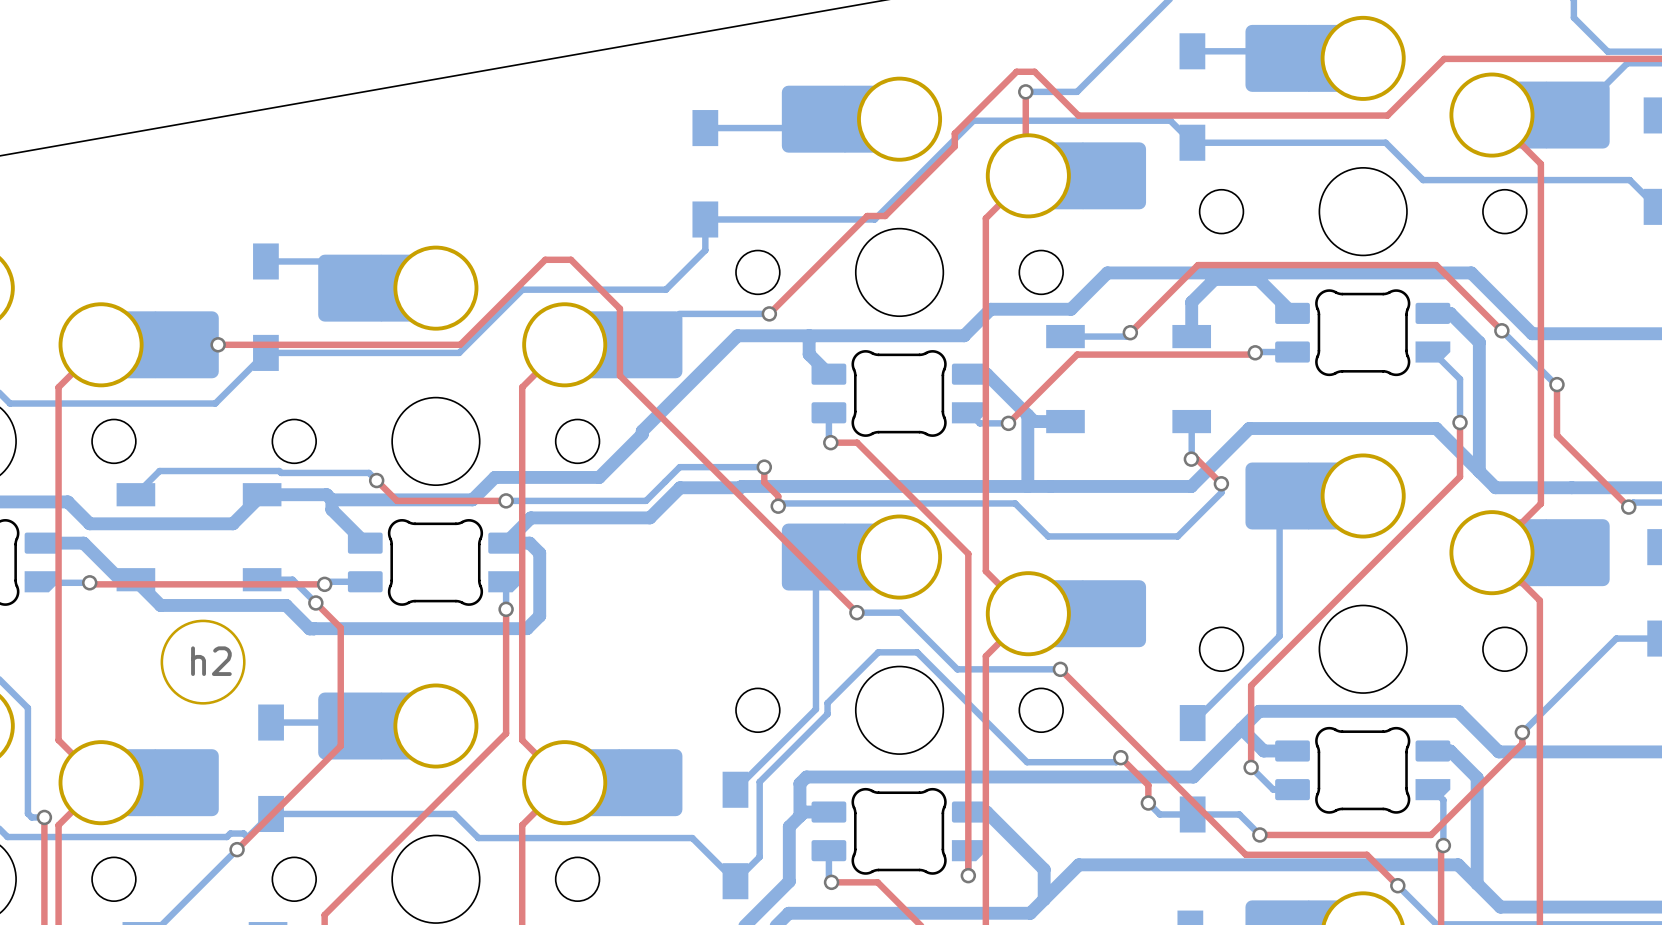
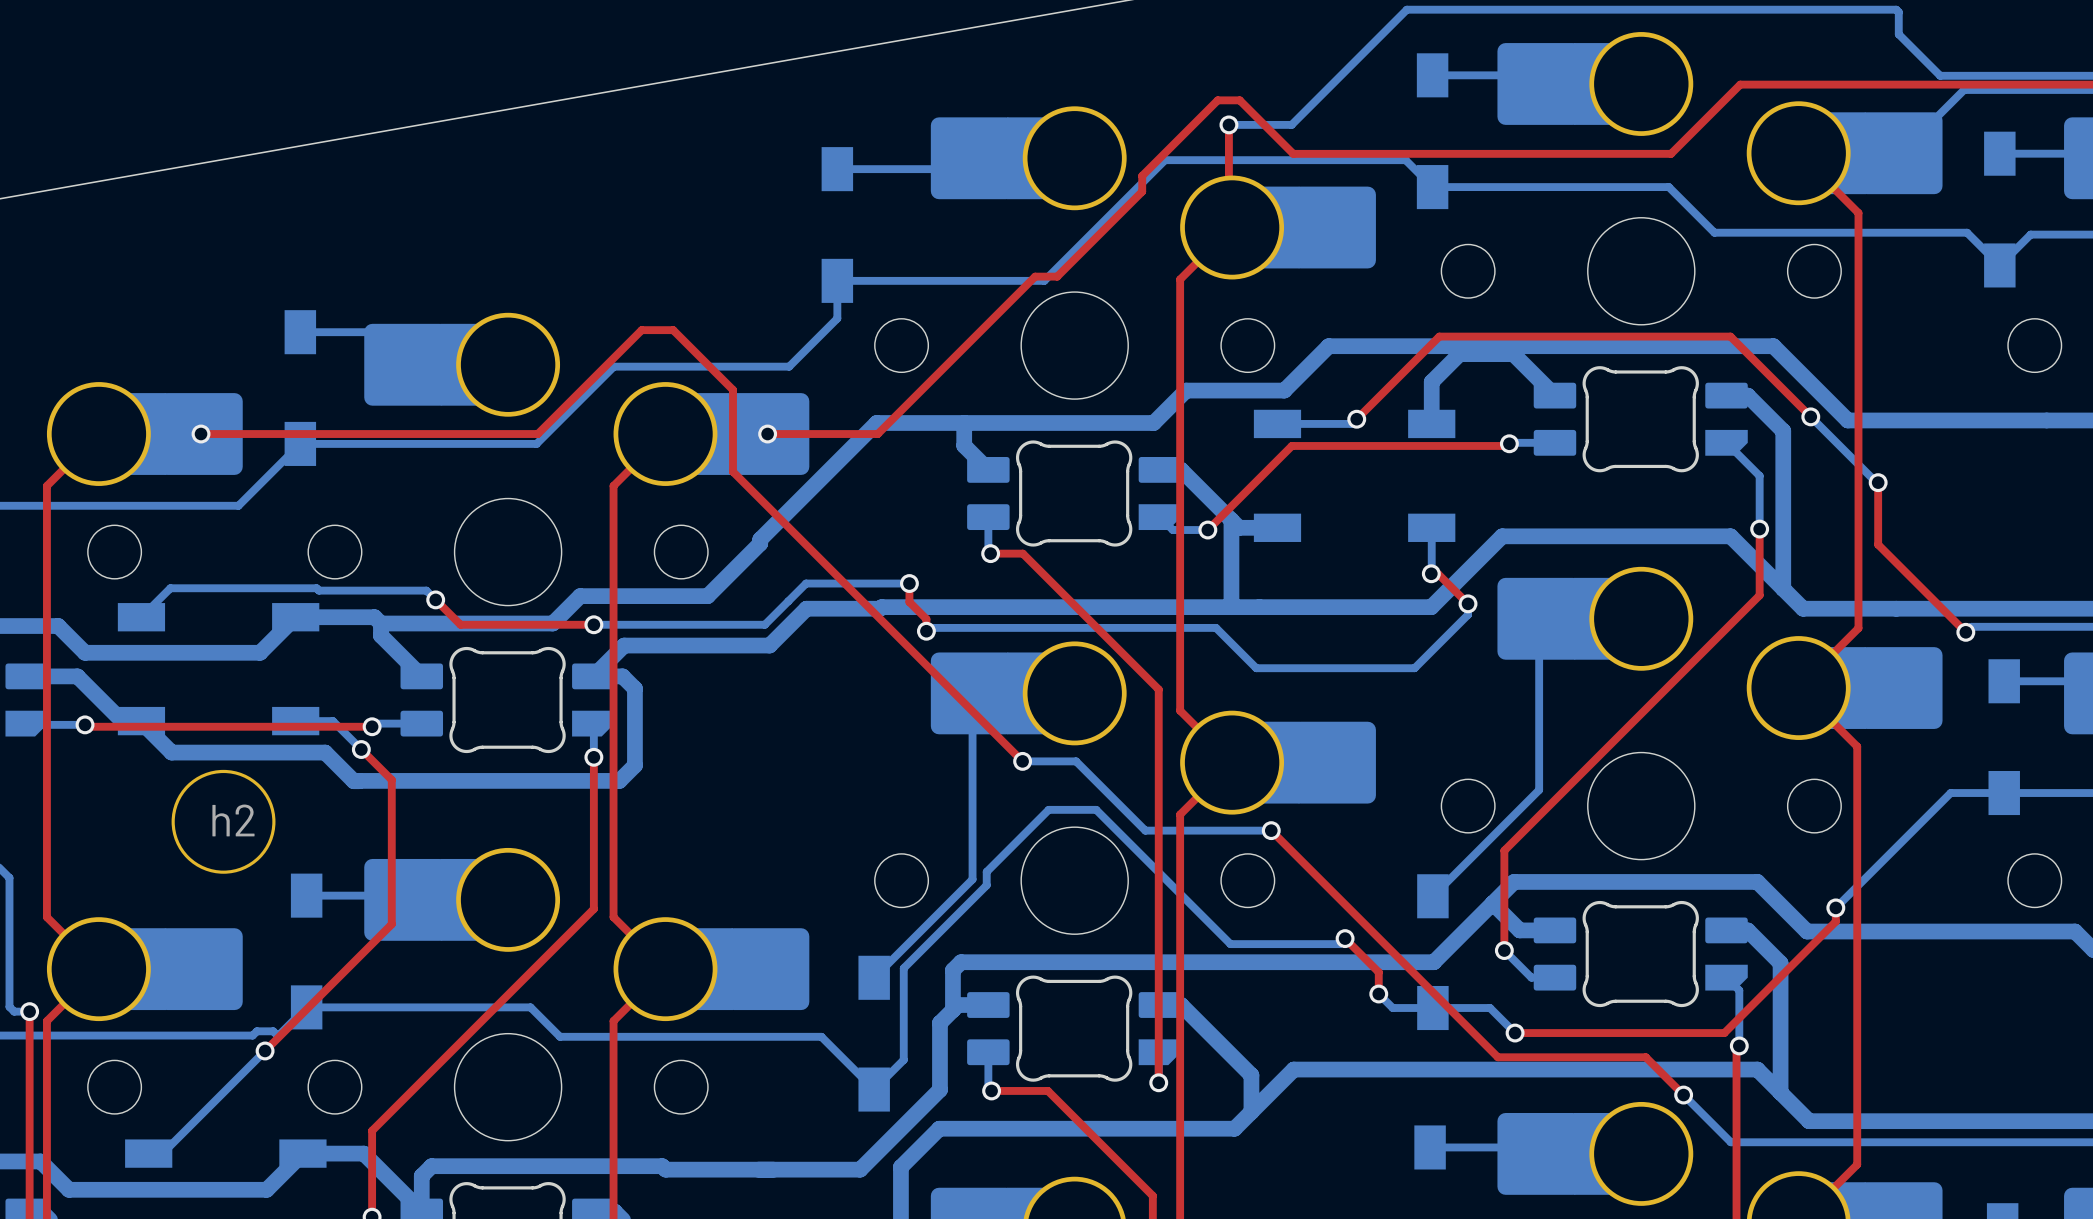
bottom track: (679, 313) (769, 313) -> none
top track: none -> (915, 396) (877, 434) (767, 434)
via position: (769, 313) -> (767, 434)
top track: none -> (201, 434) (241, 434)
via position: (218, 344) -> (201, 434)

